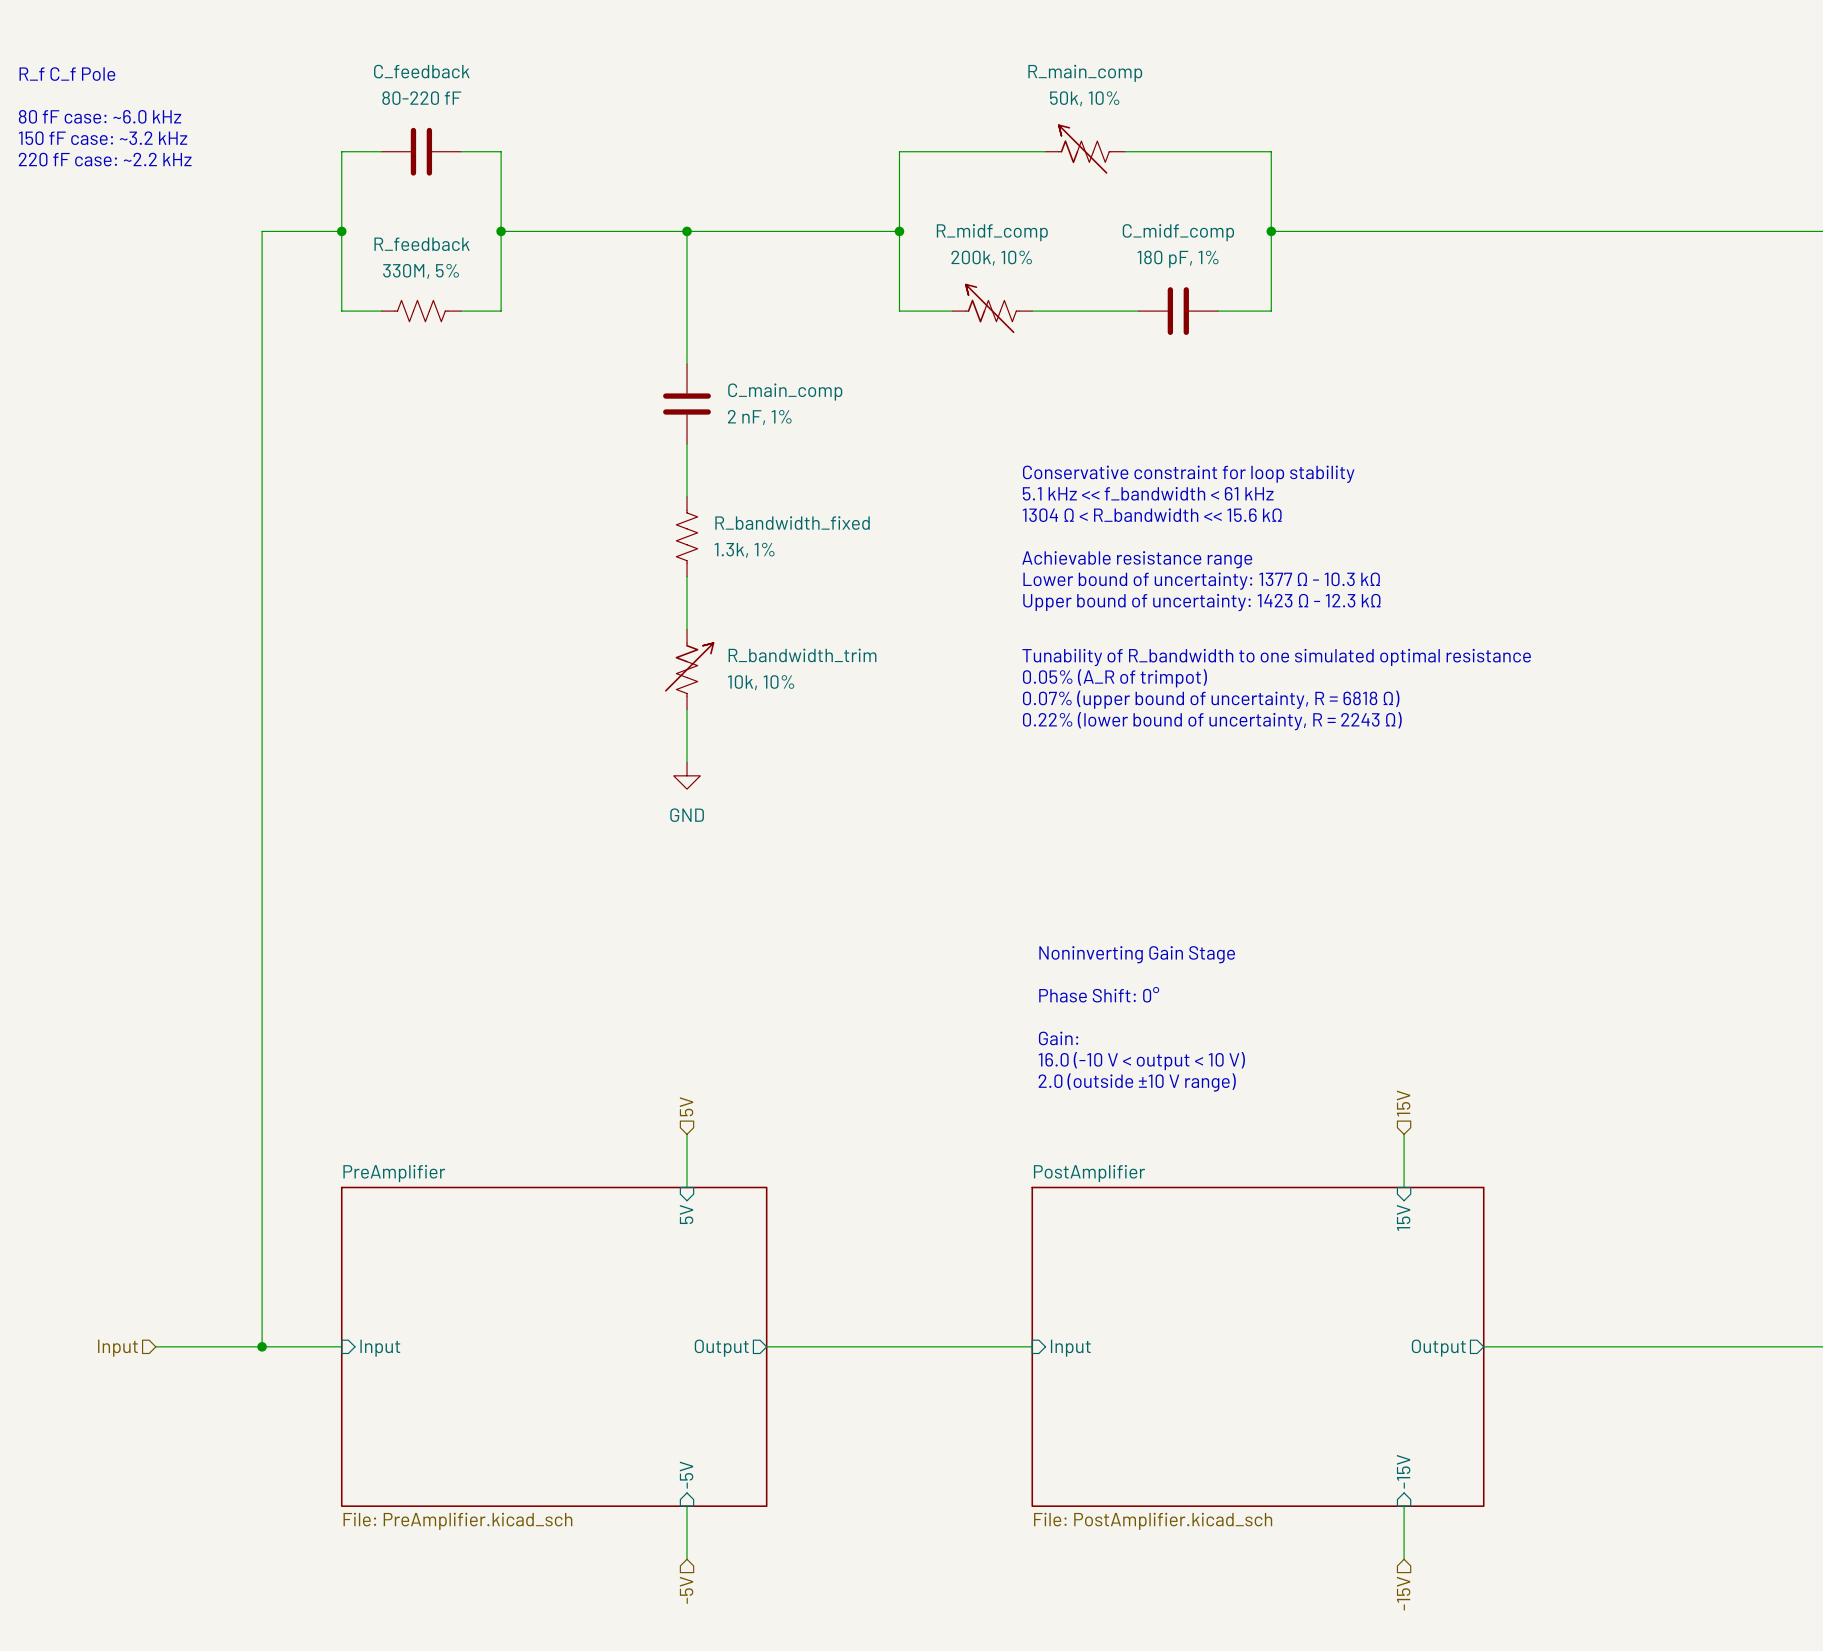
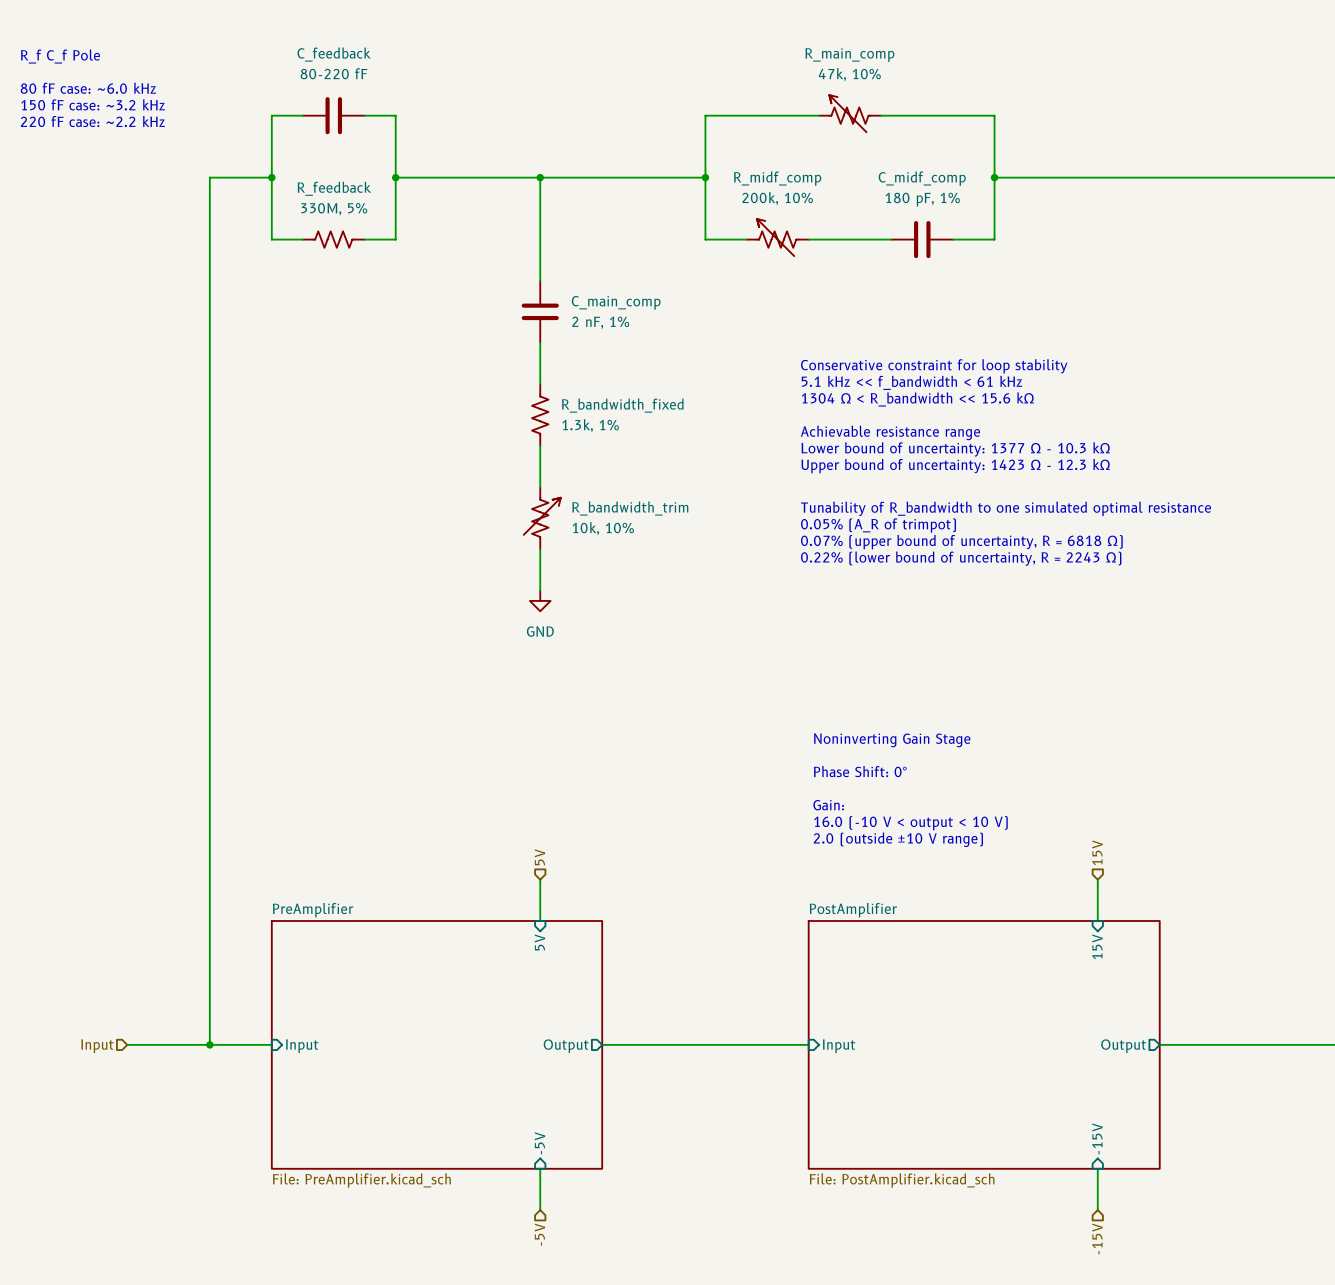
R_main_comp value: 50k, 10% (1084, 98) -> 47k, 10% (849, 74)

